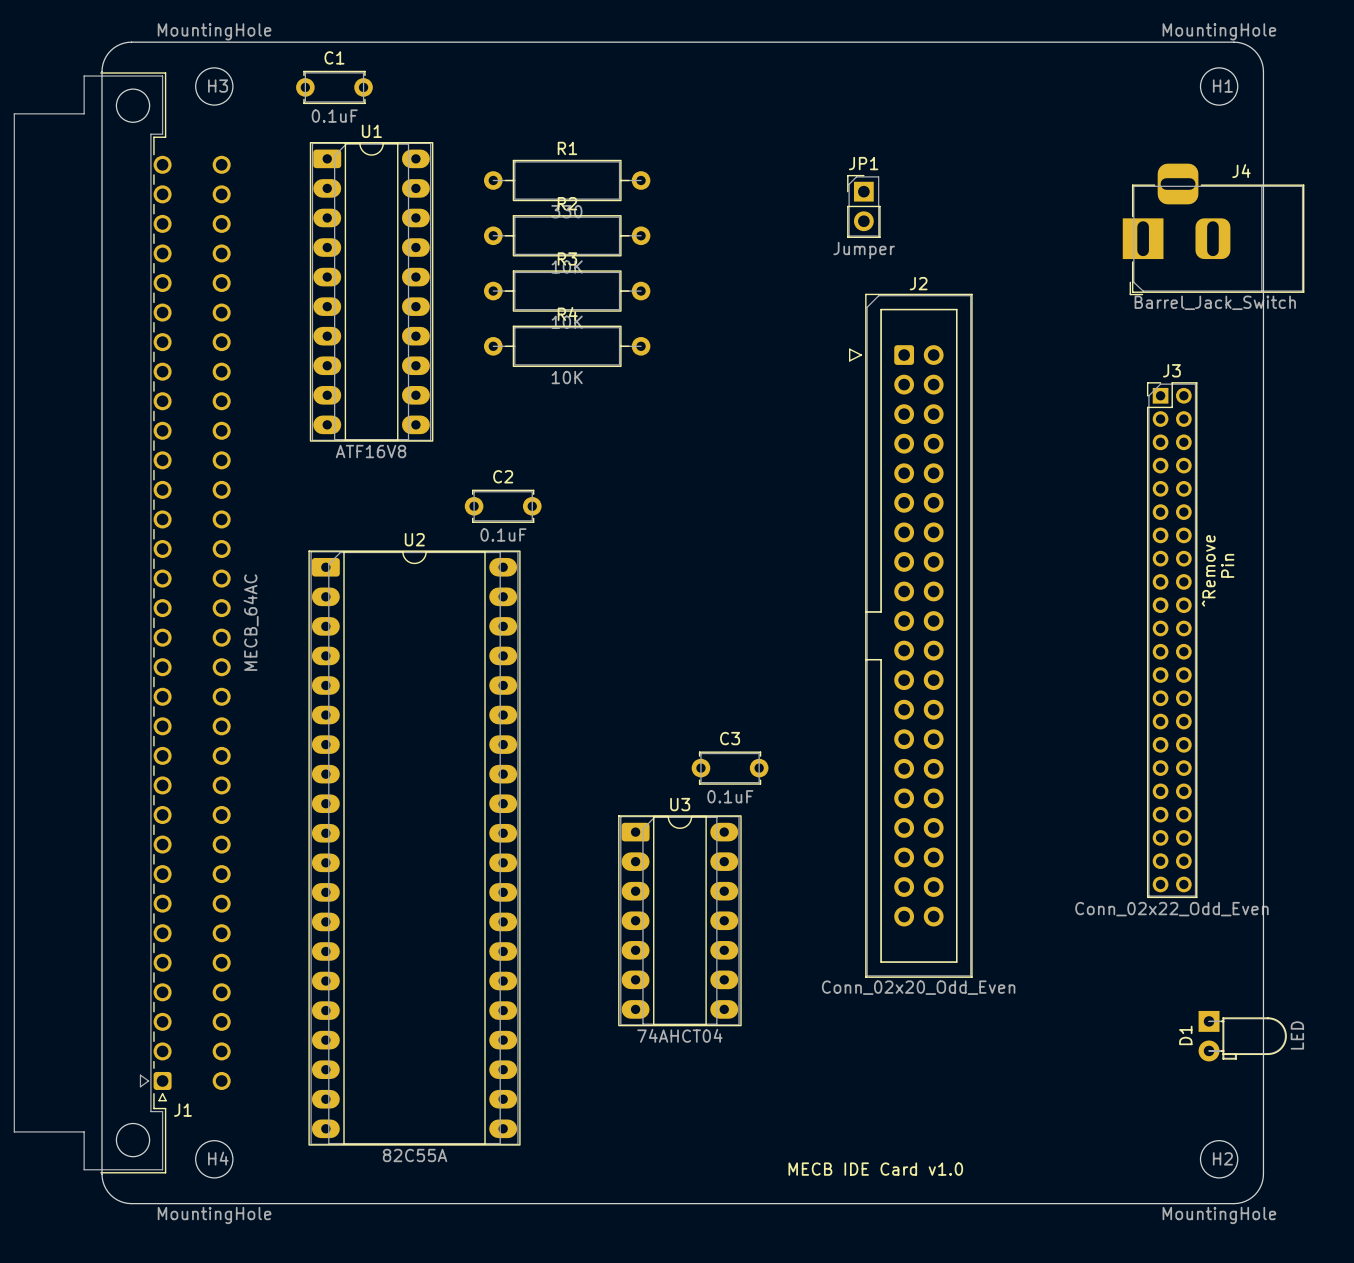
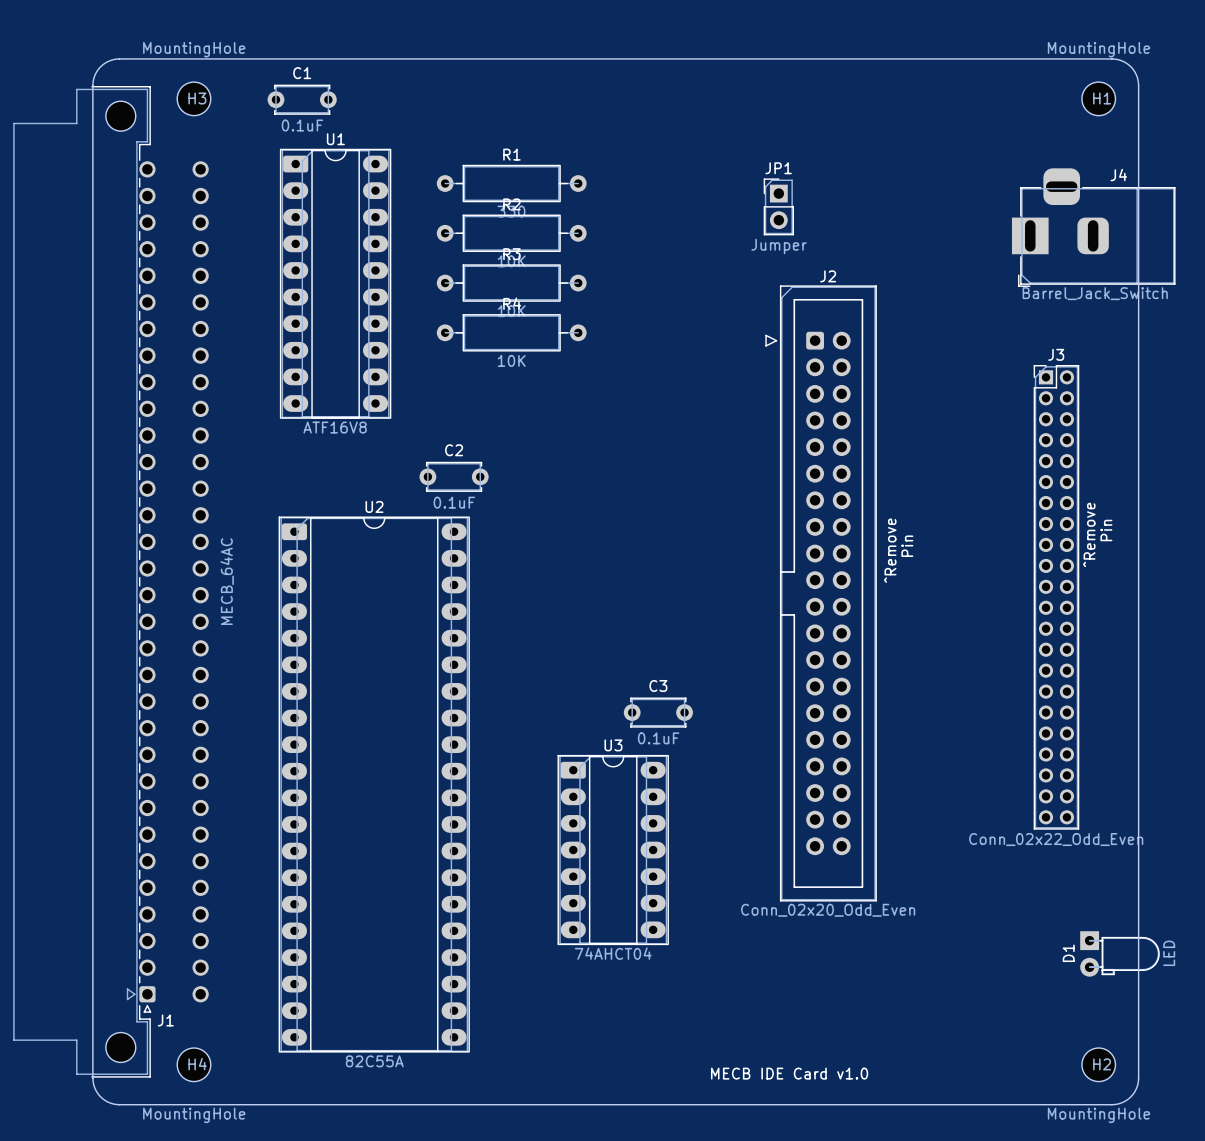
text: none -> Pin (907, 546)
text: none -> ^Remove (890, 550)

